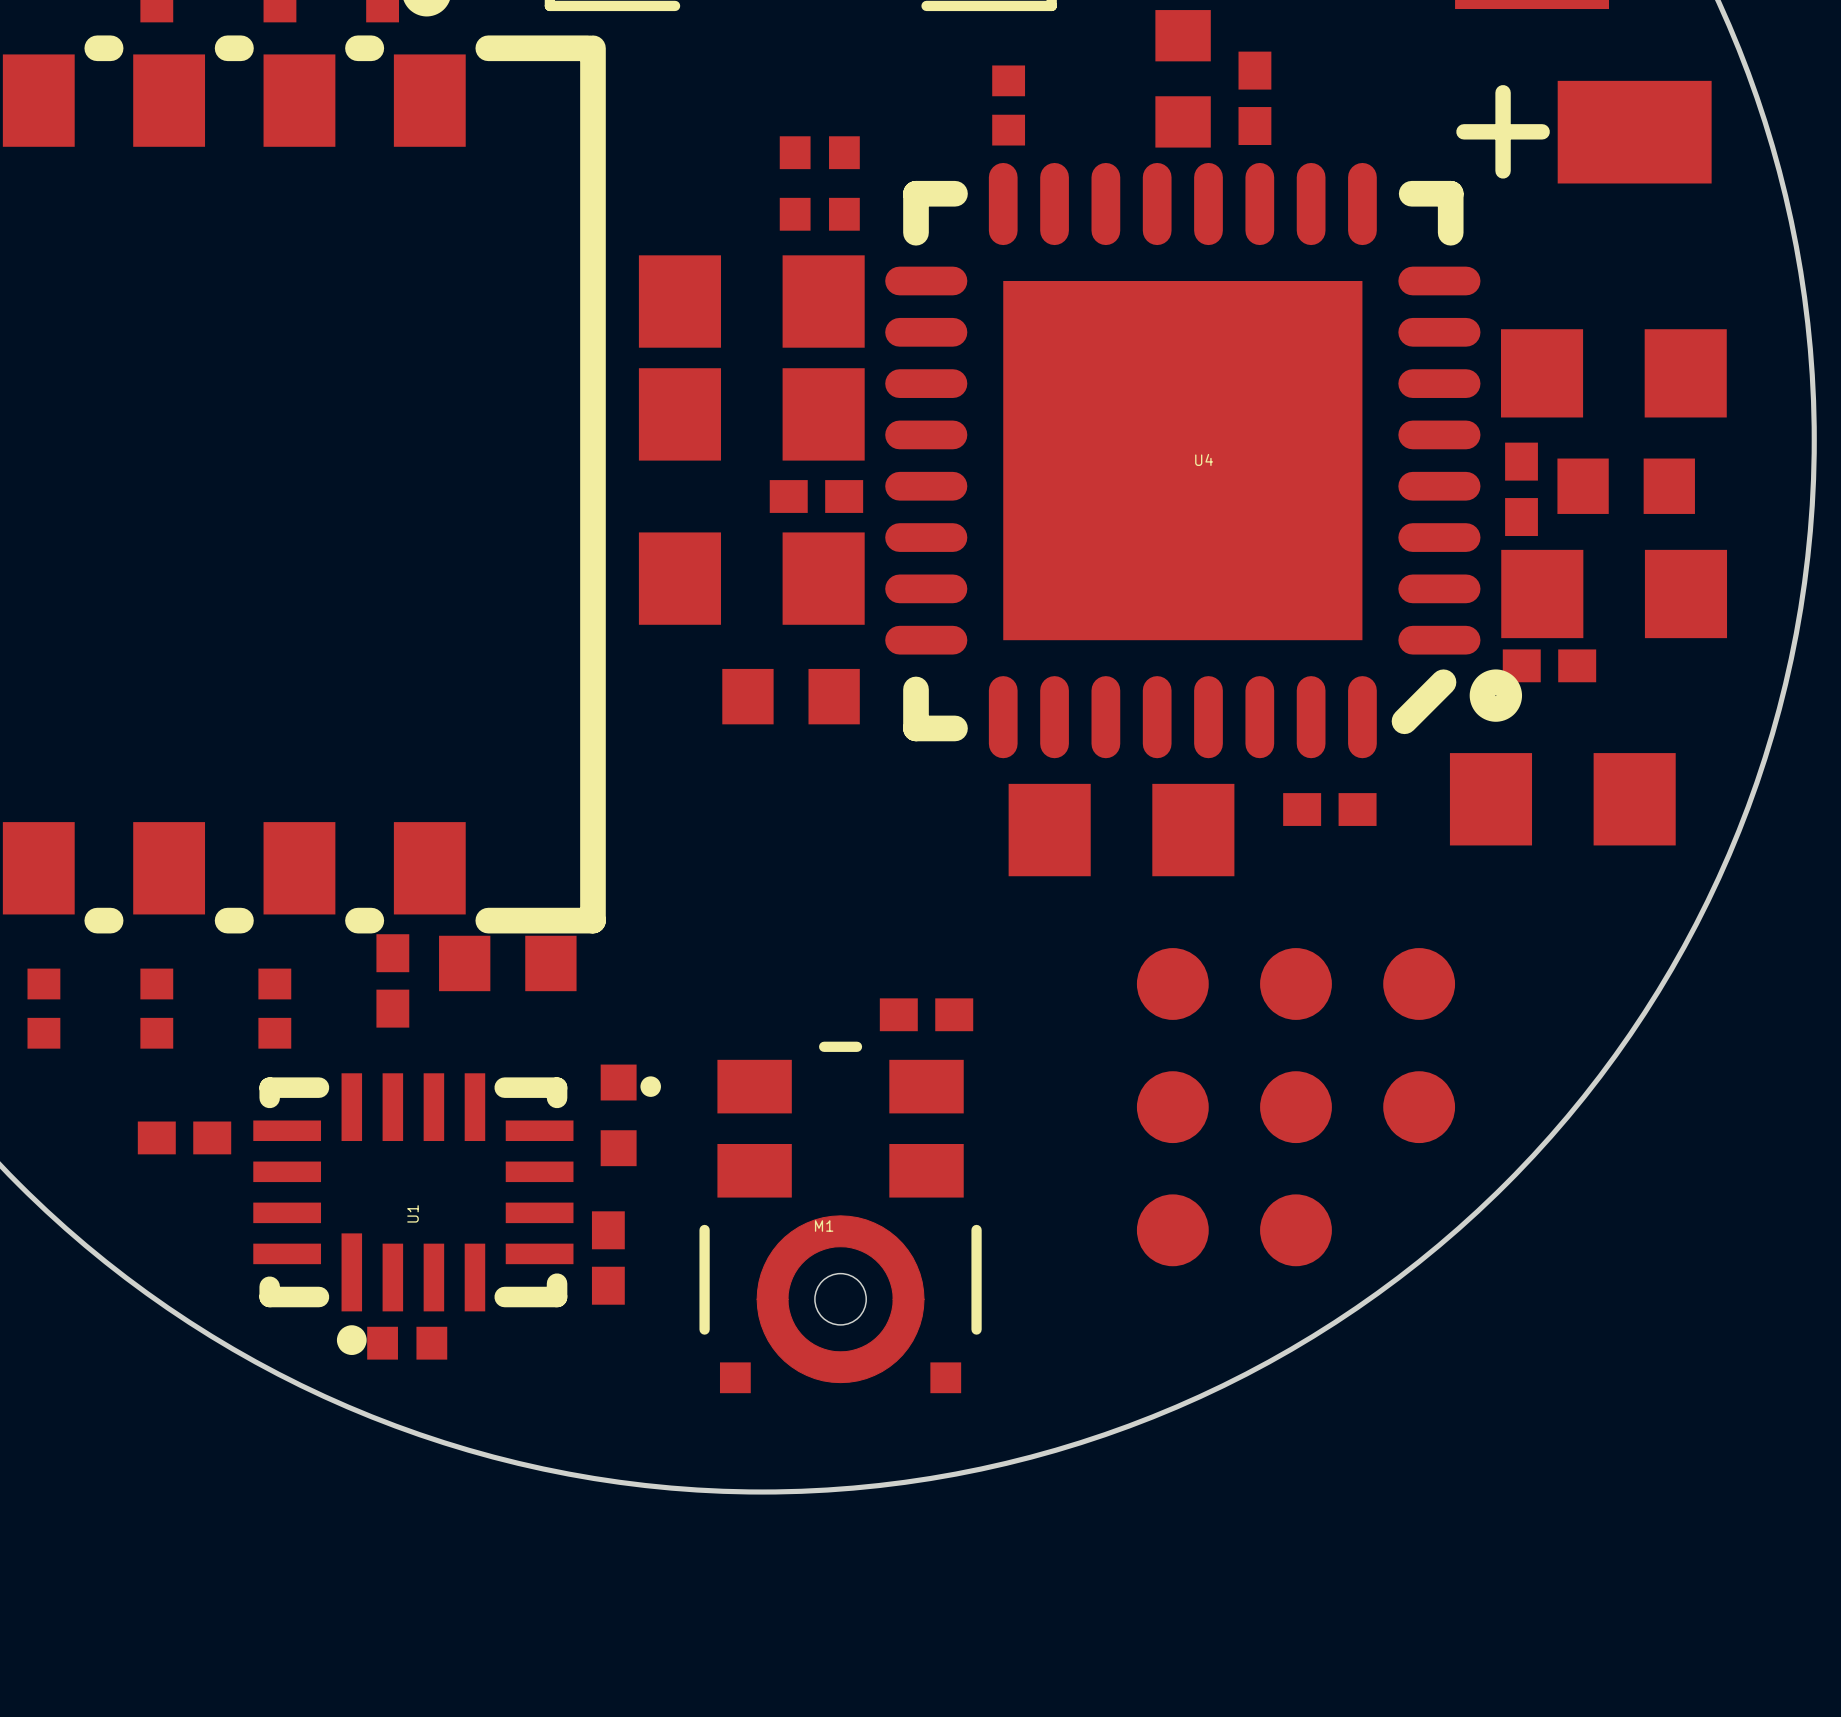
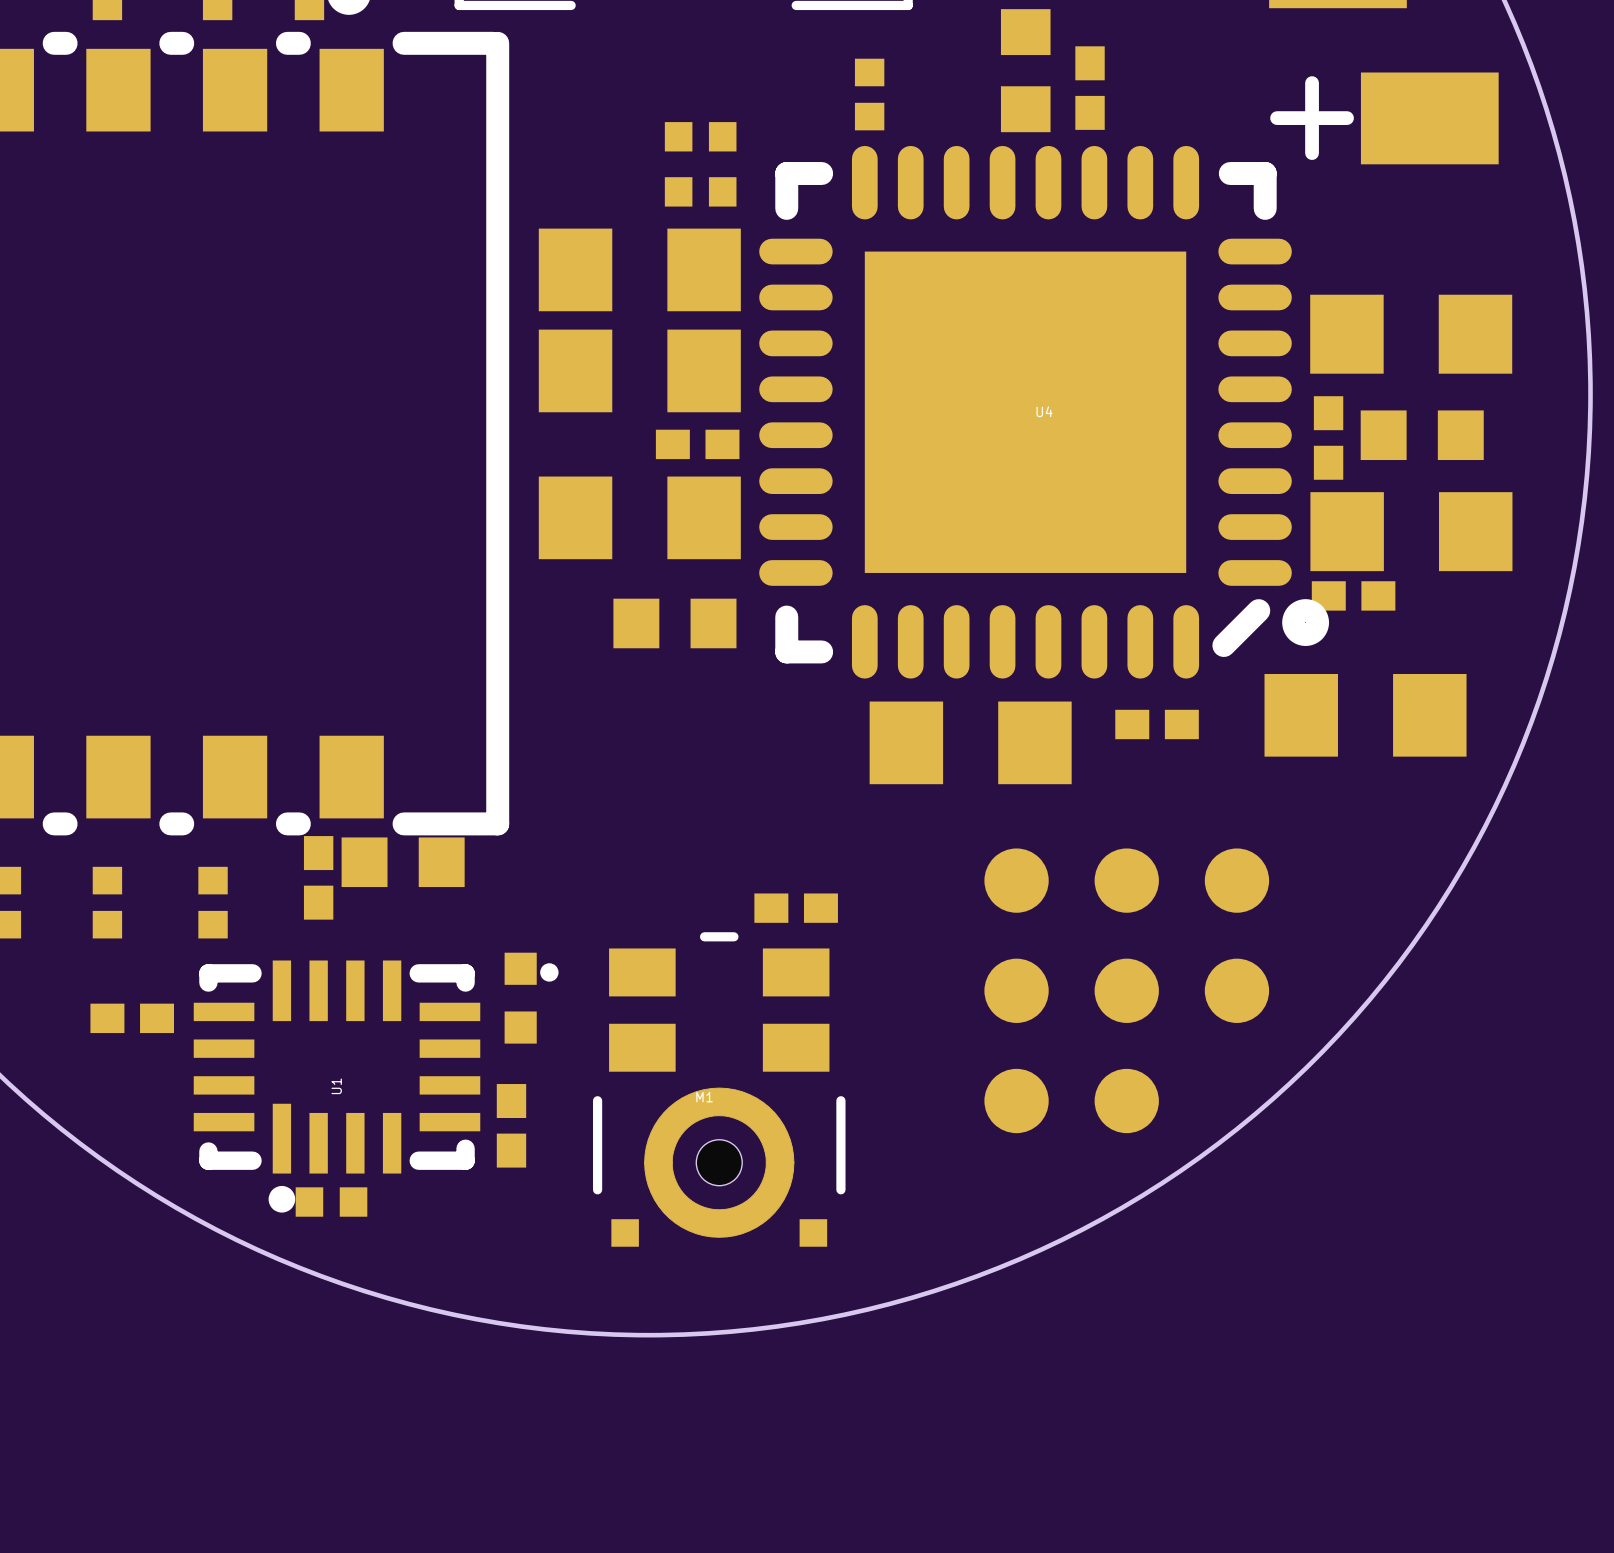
part position: (507, 963) -> (403, 862)

